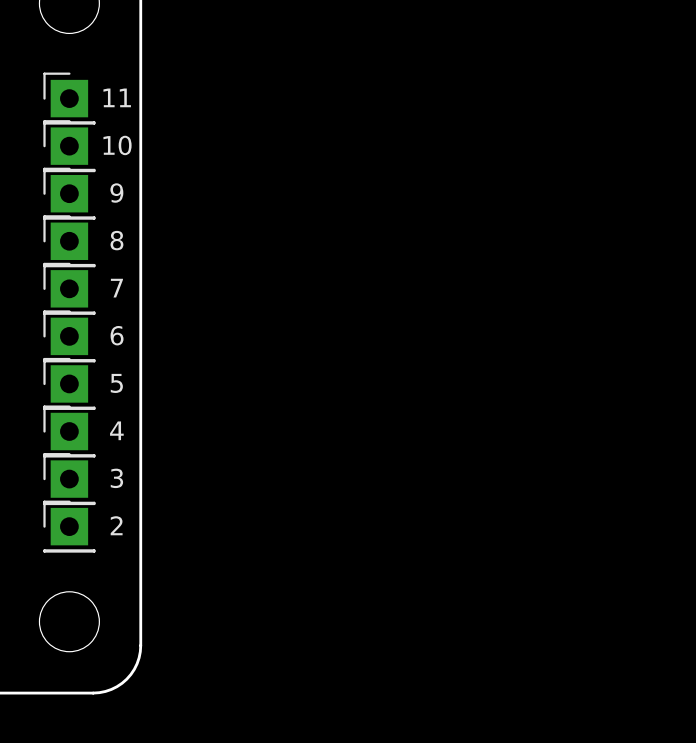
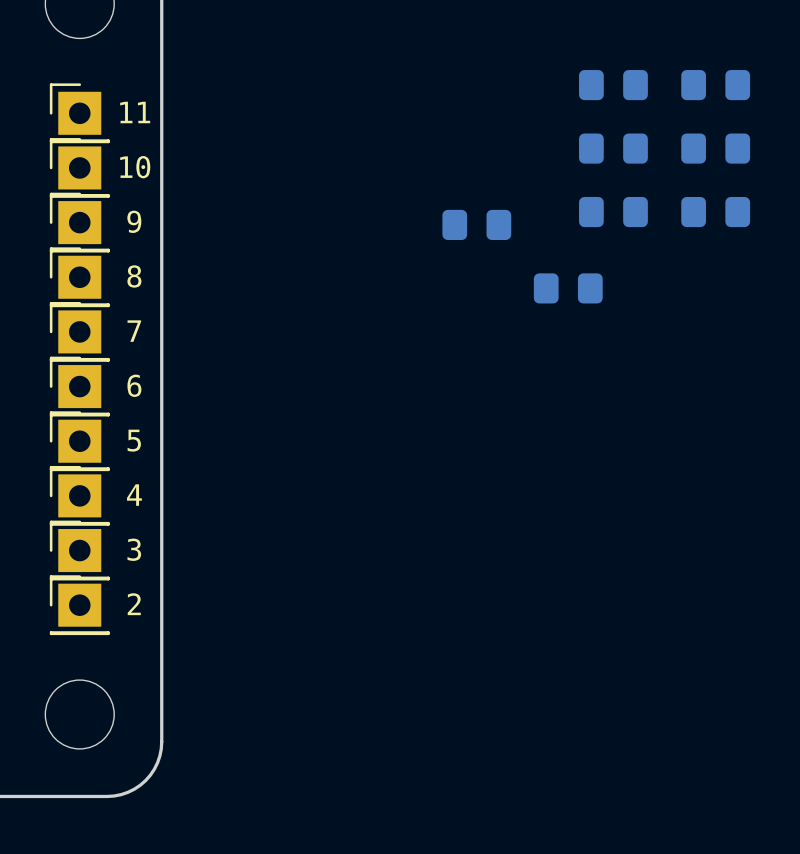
part: none -> (613, 85)
part: none -> (715, 85)
part: none -> (613, 148)
part: none -> (715, 148)
part: none -> (613, 212)
part: none -> (715, 212)
part: none -> (476, 224)
part: none -> (568, 288)

